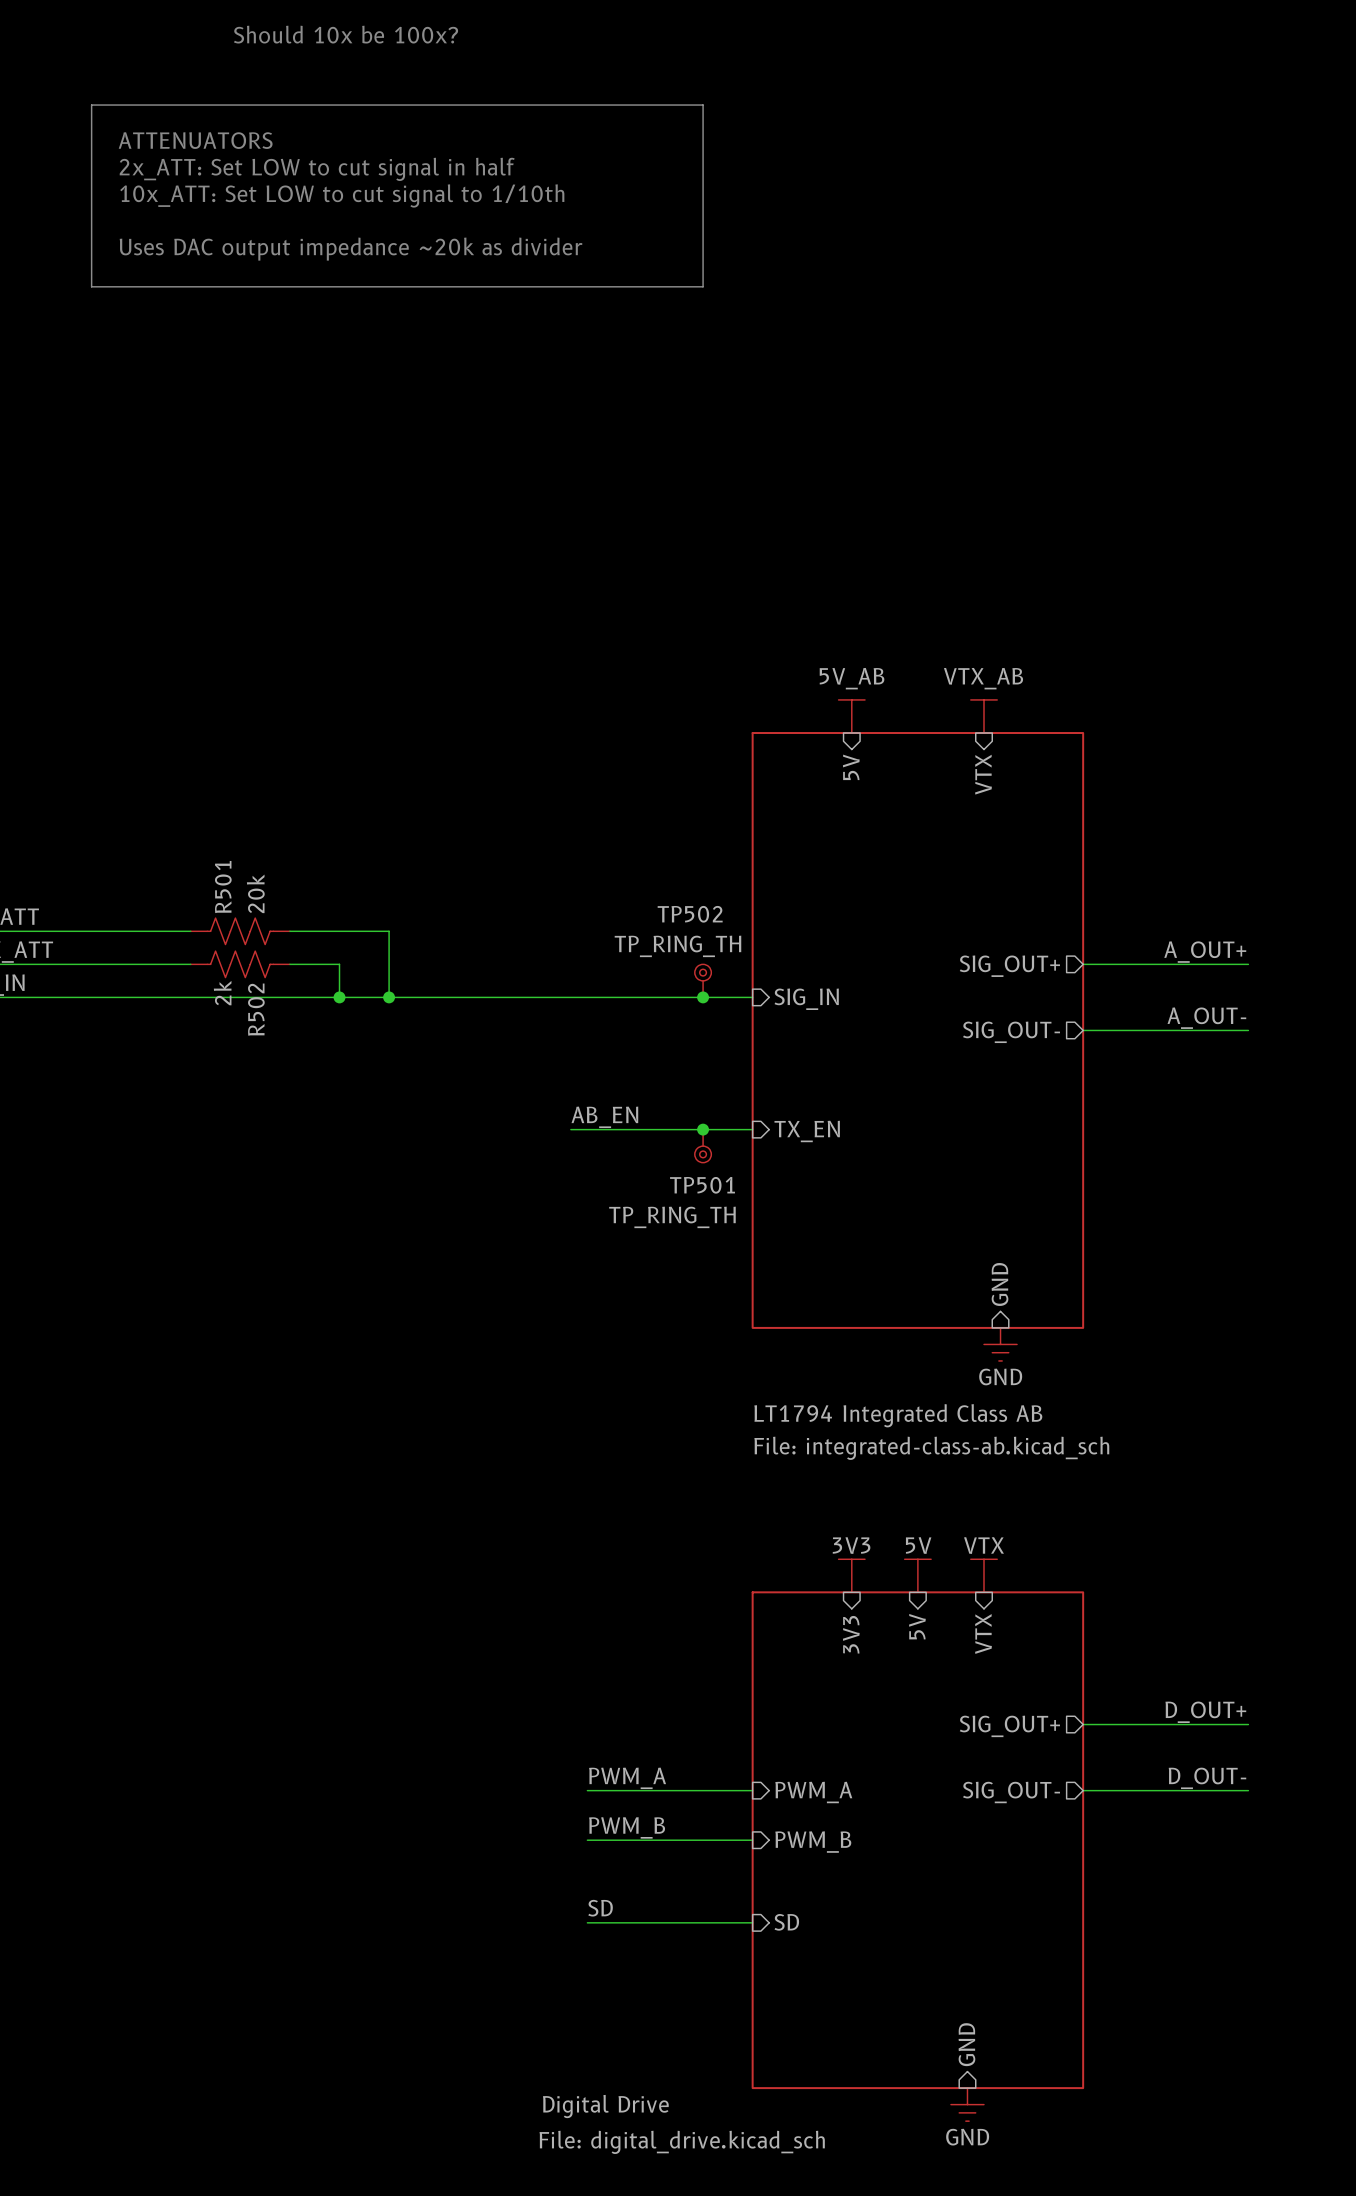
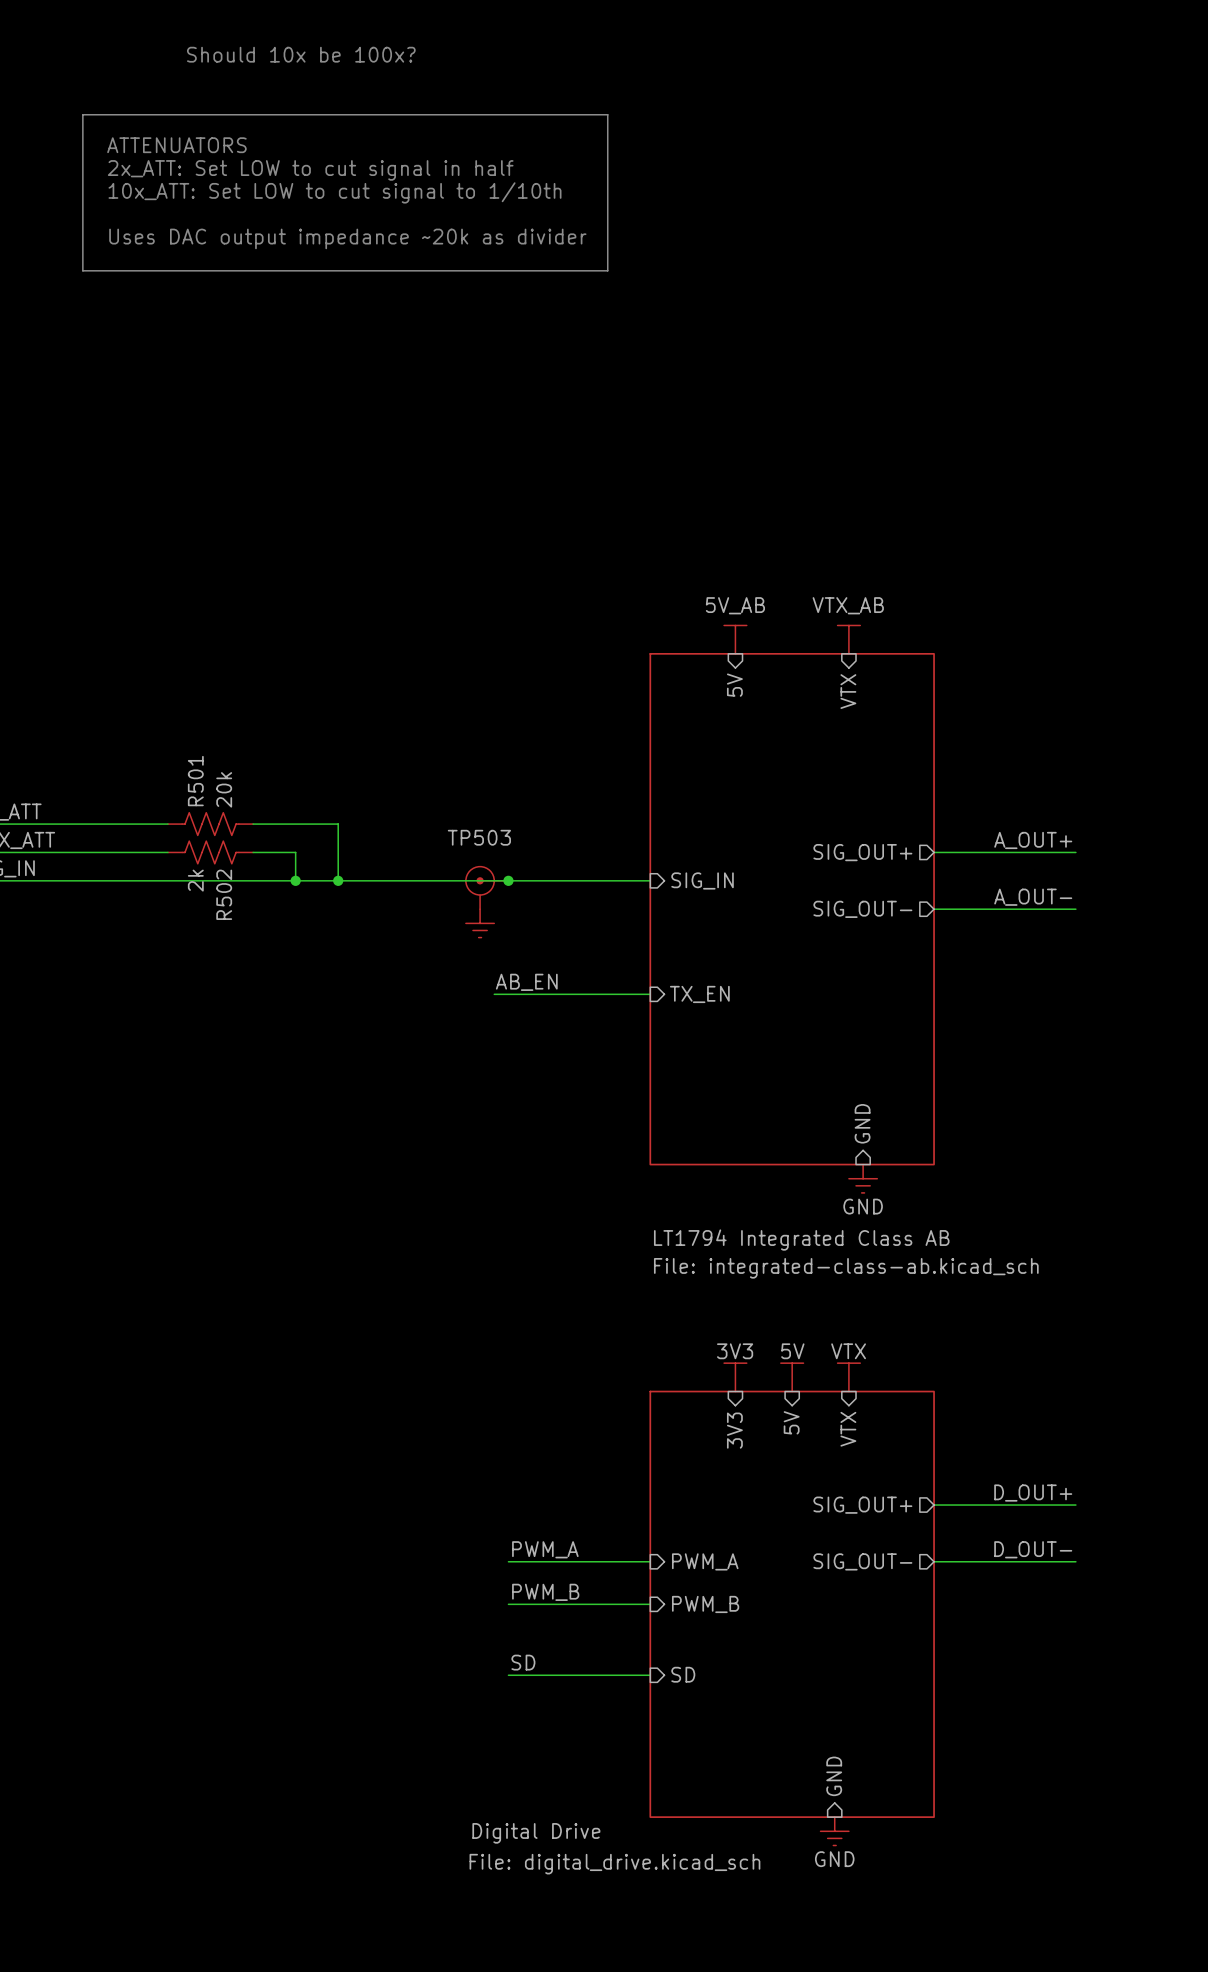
TP502: TP_RING_TH (703, 980) -> none
junction: none -> (508, 880)
junction: (703, 997) -> none
TP503: none -> (487, 887)
power symbol: none -> (480, 923)
junction: (703, 1129) -> none
TP501: TP_RING_TH (703, 1146) -> none

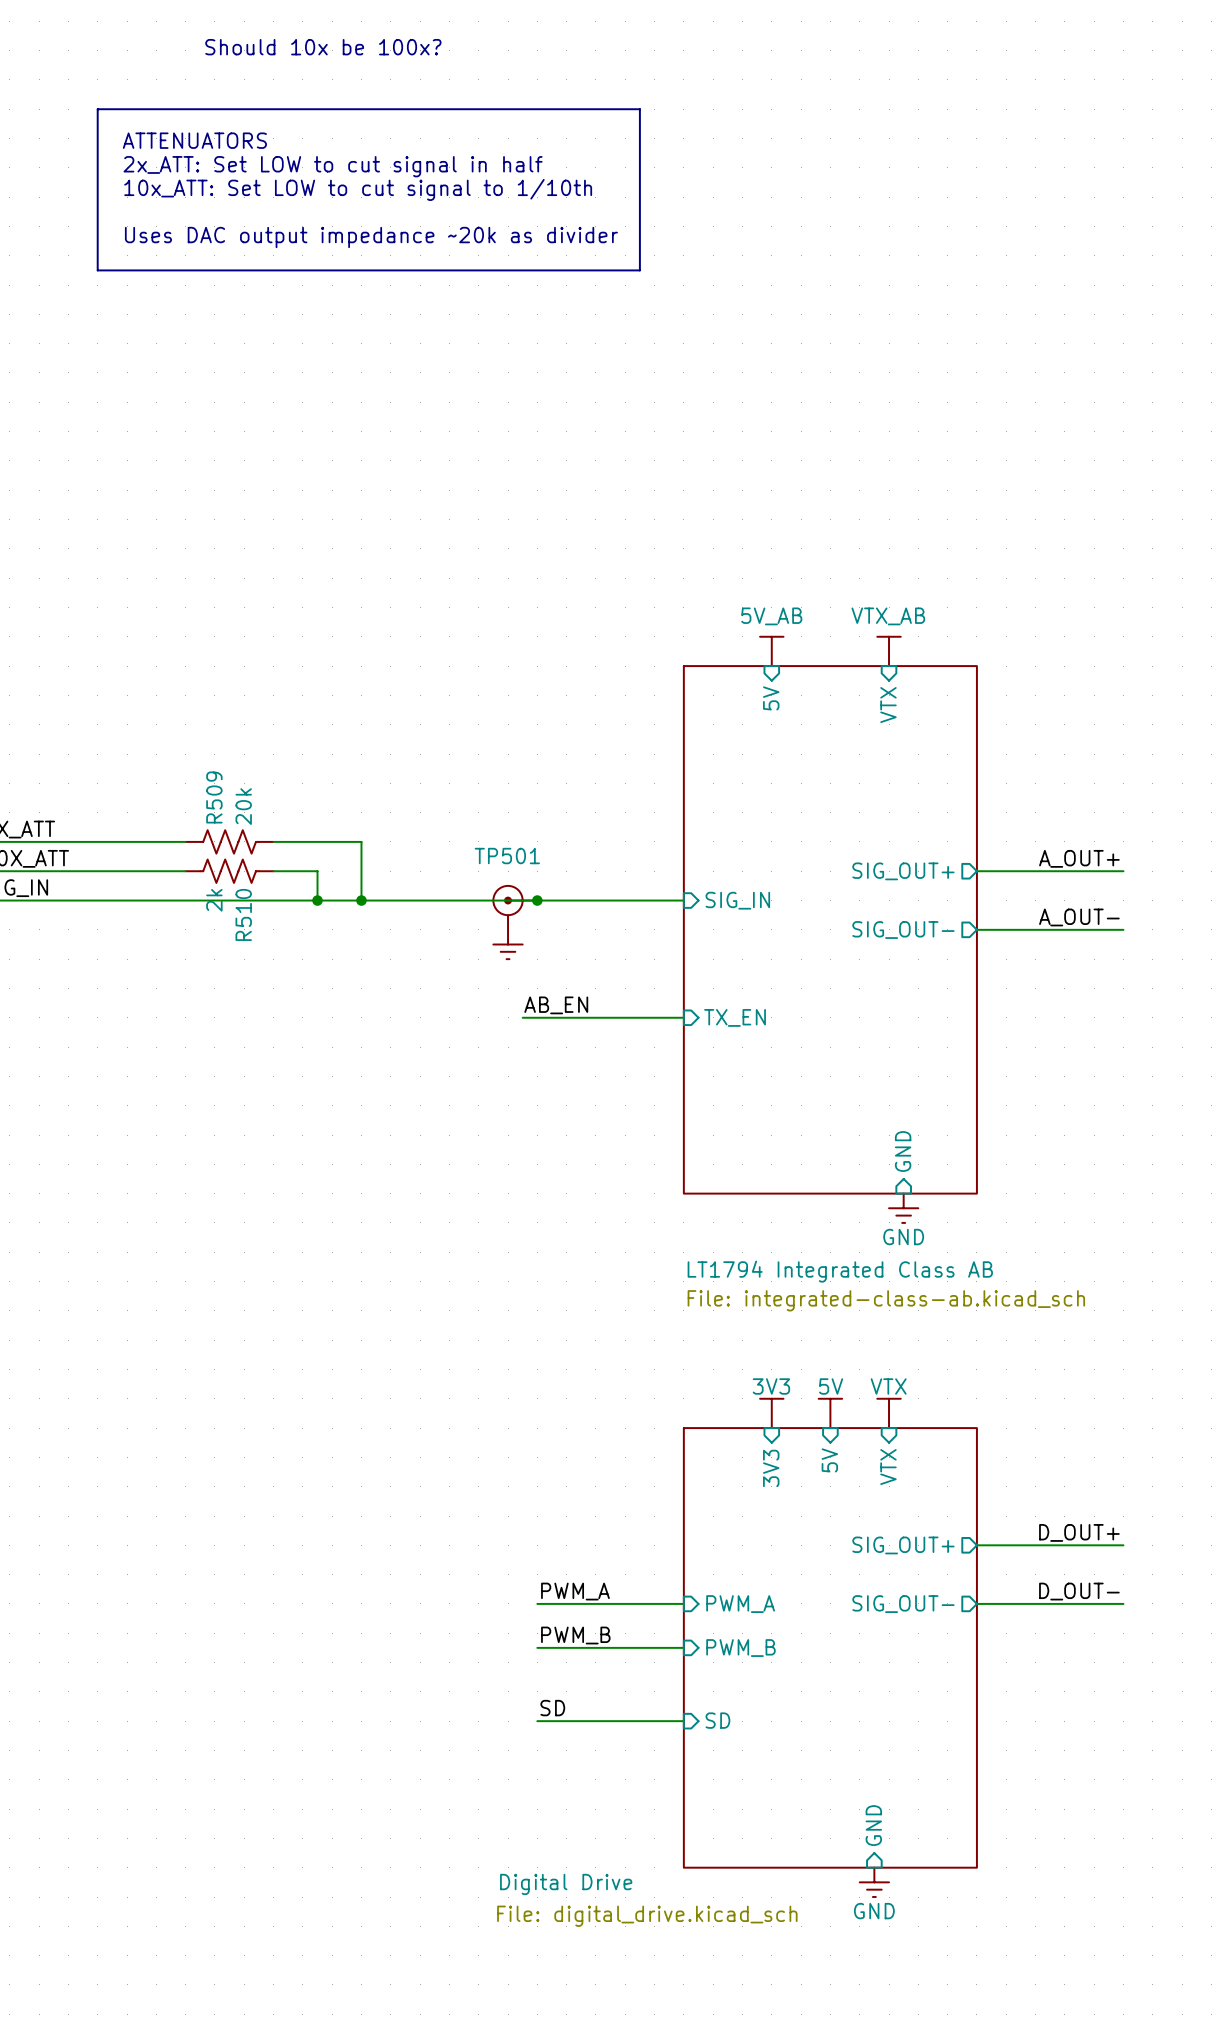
R501 name: R501 (195, 781) -> R509 (214, 797)
TP503 name: TP503 (479, 837) -> TP501 (507, 856)
R502 name: R502 (224, 894) -> R510 (243, 914)

